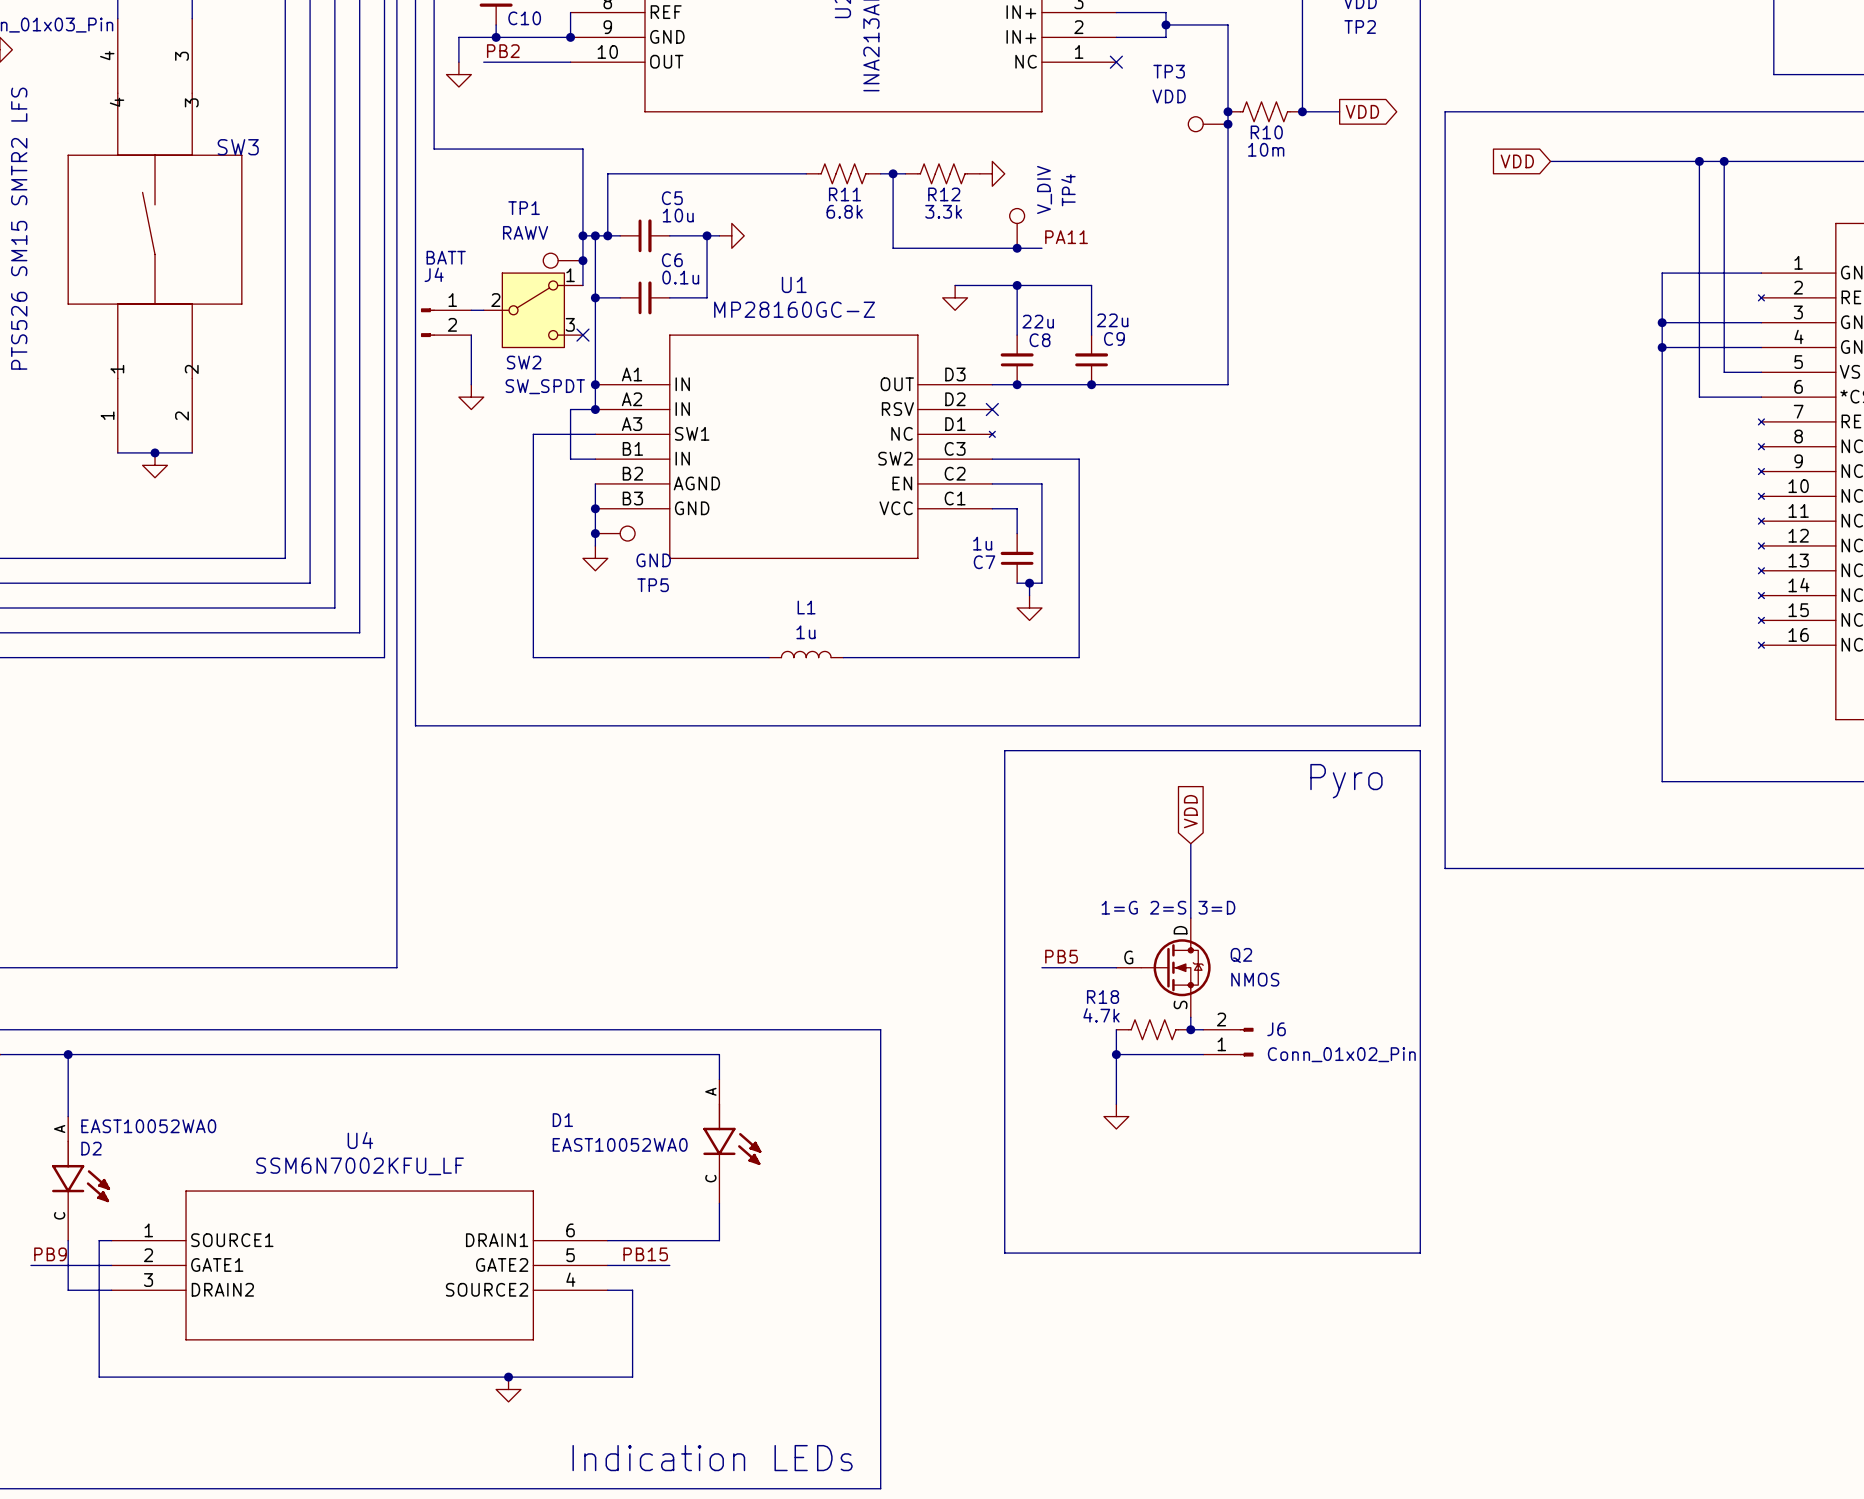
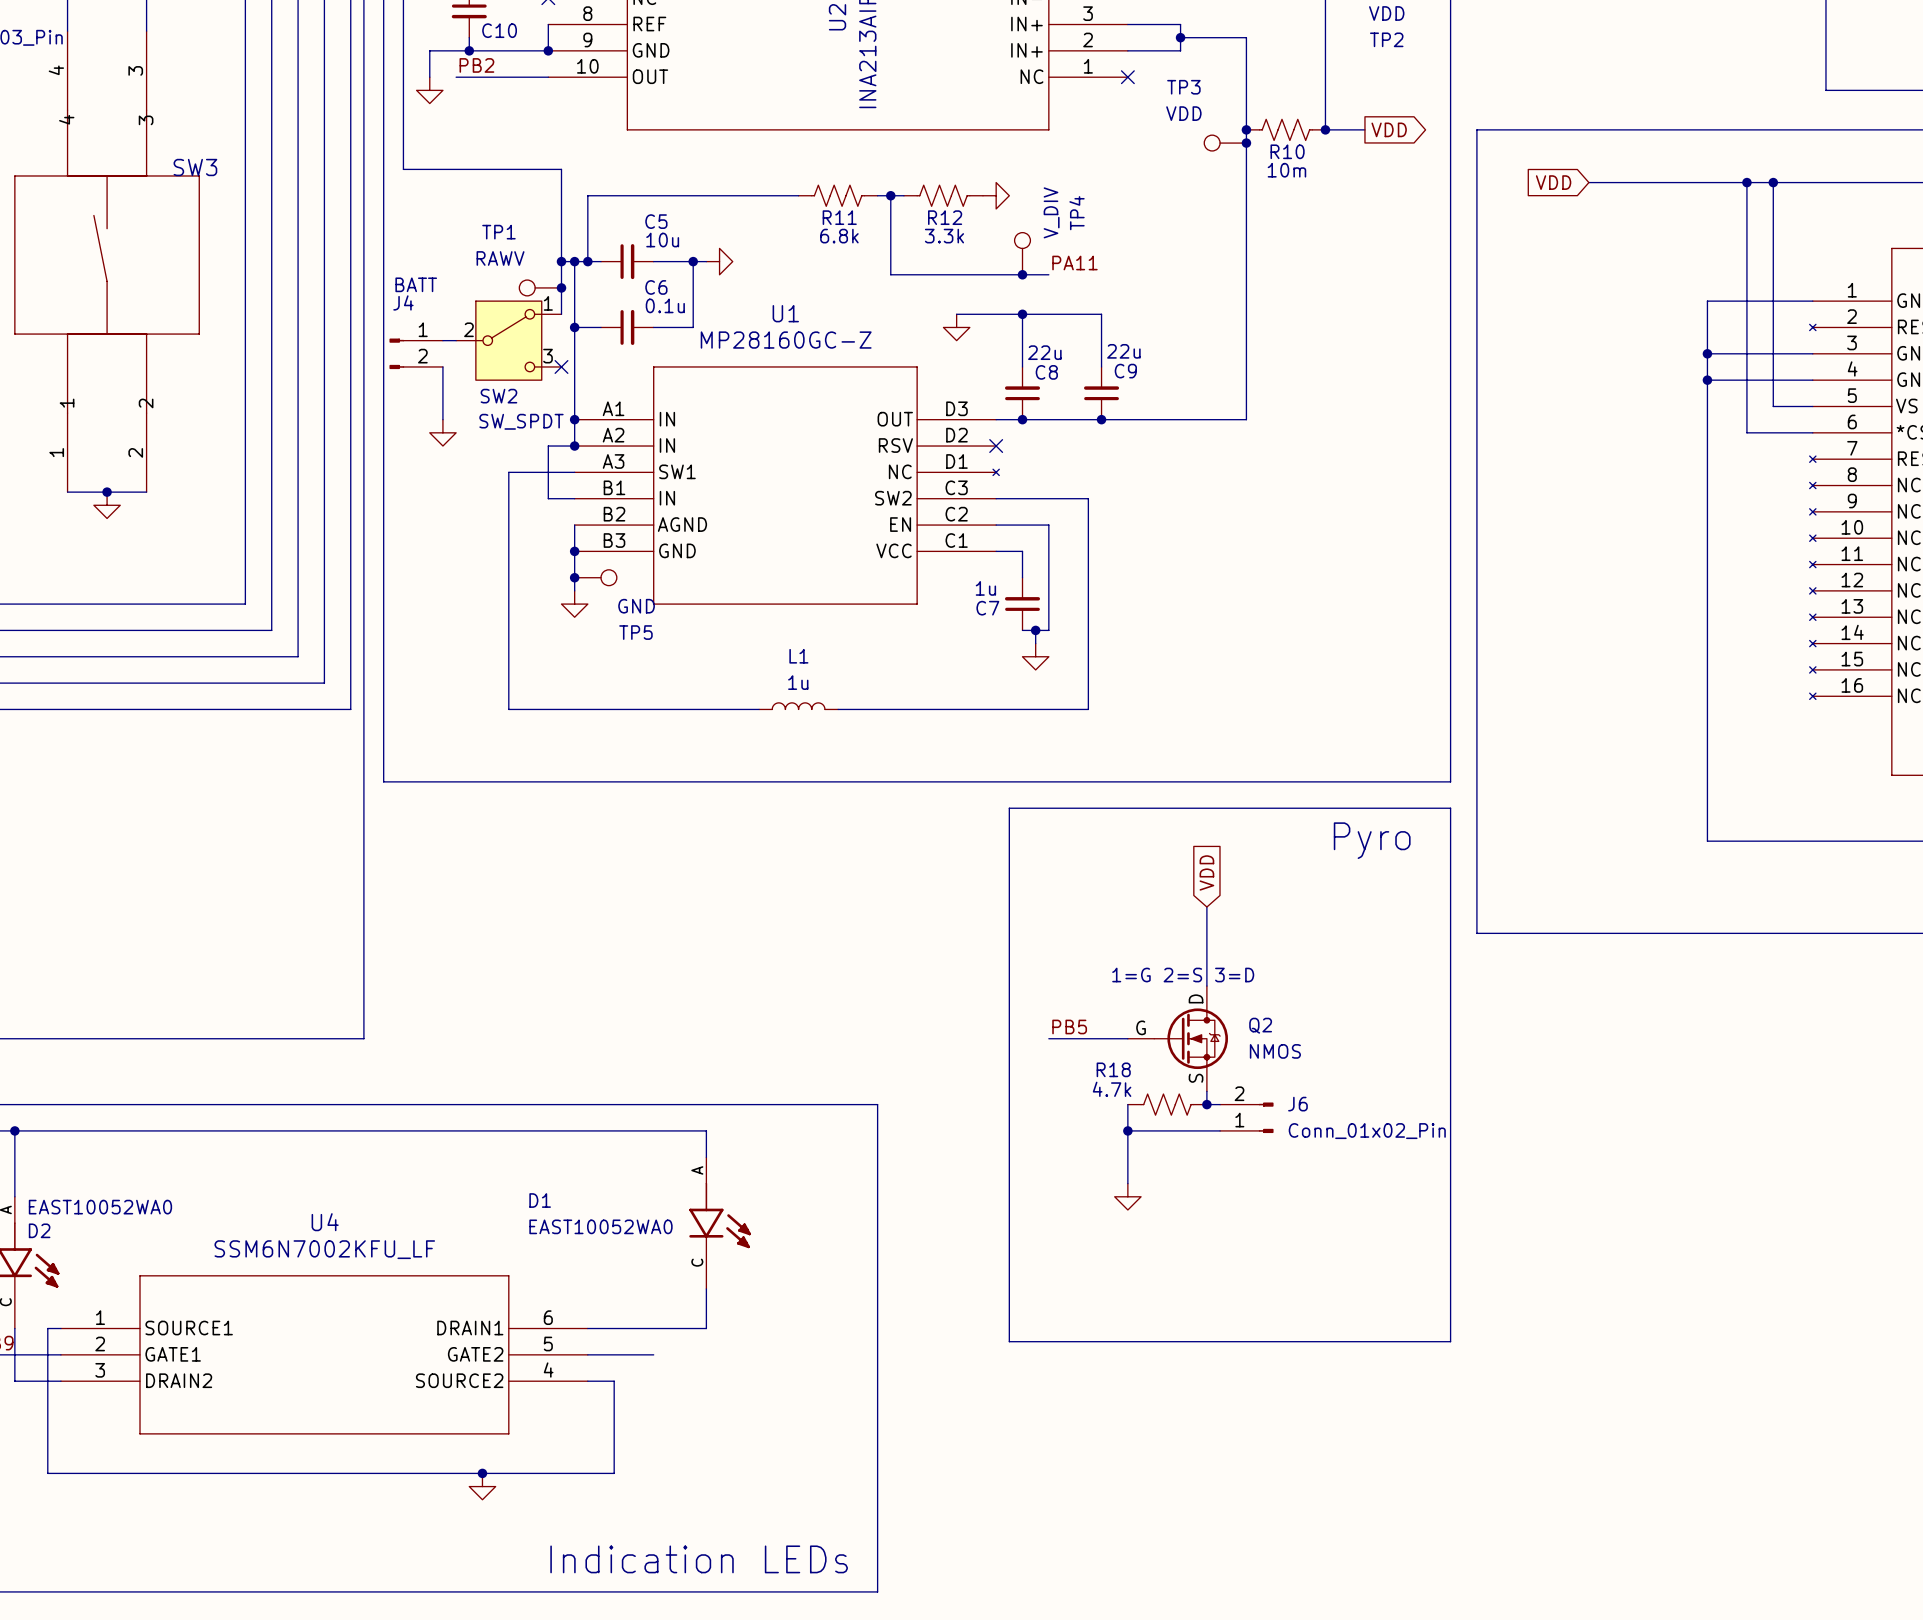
label: PB15 (645, 1254) -> none

